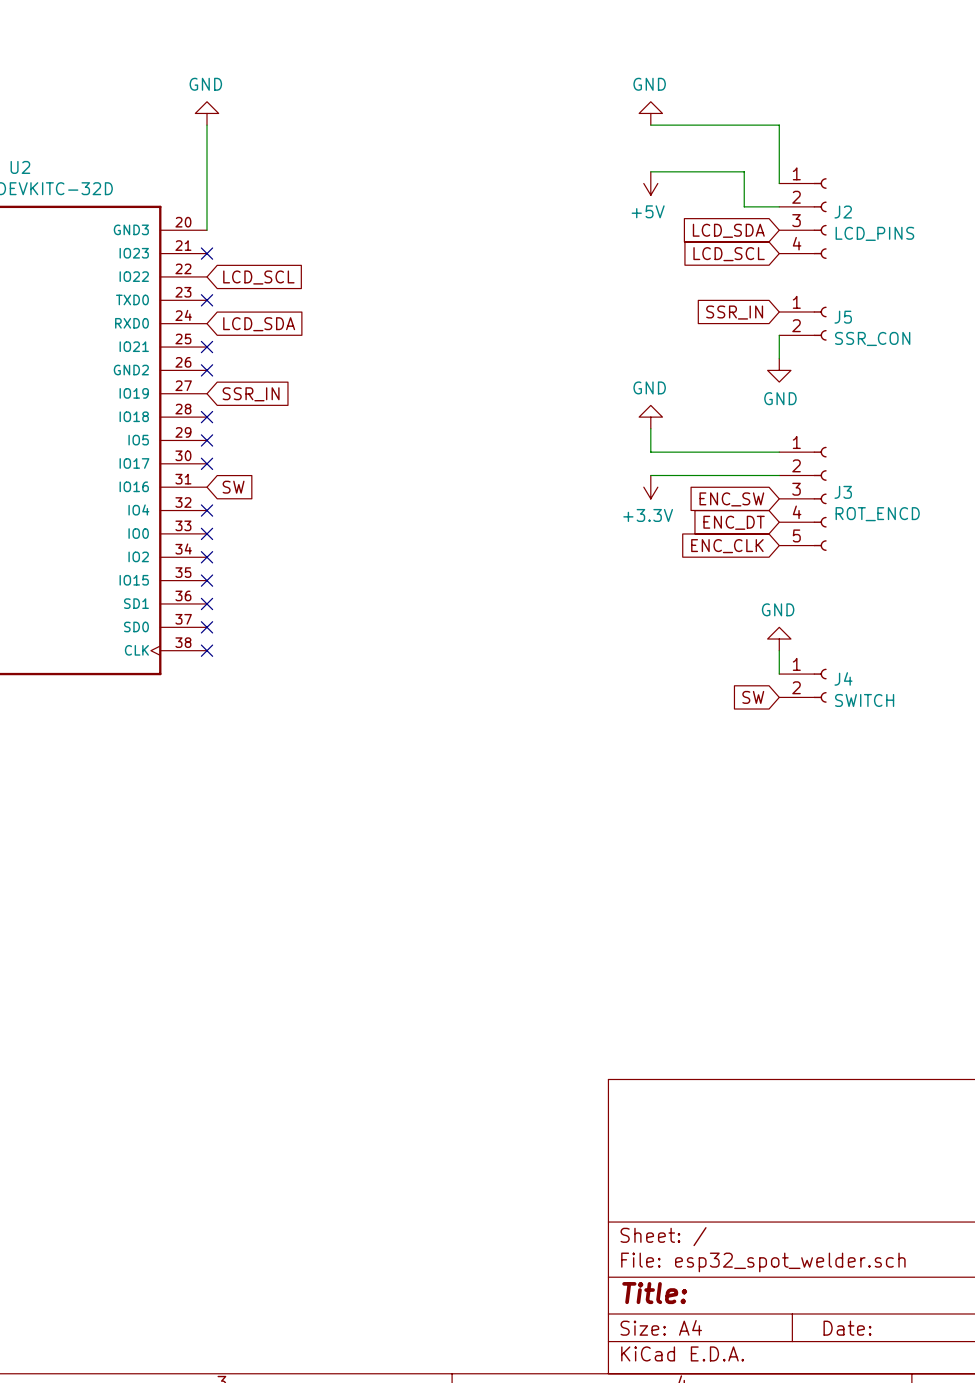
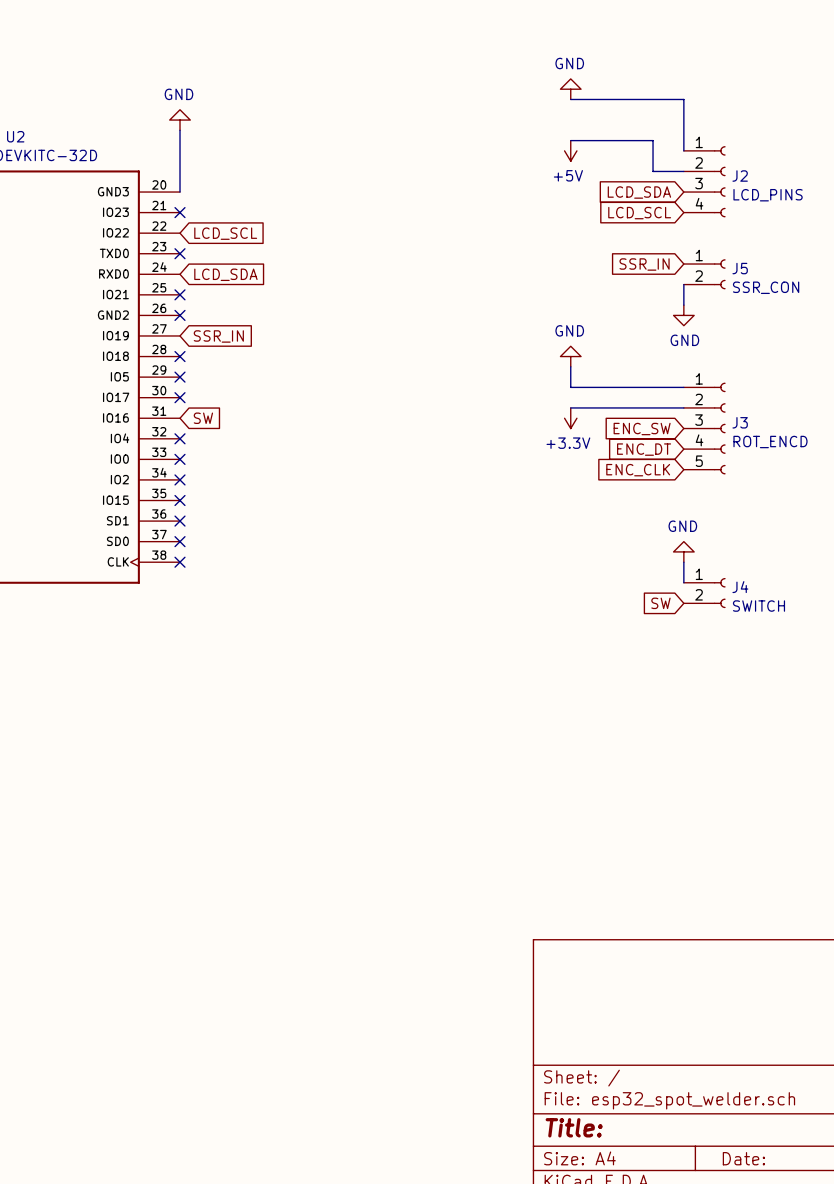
power symbol position: GND (207, 113) -> GND (180, 120)
wire: (207, 125) (207, 160) -> none

